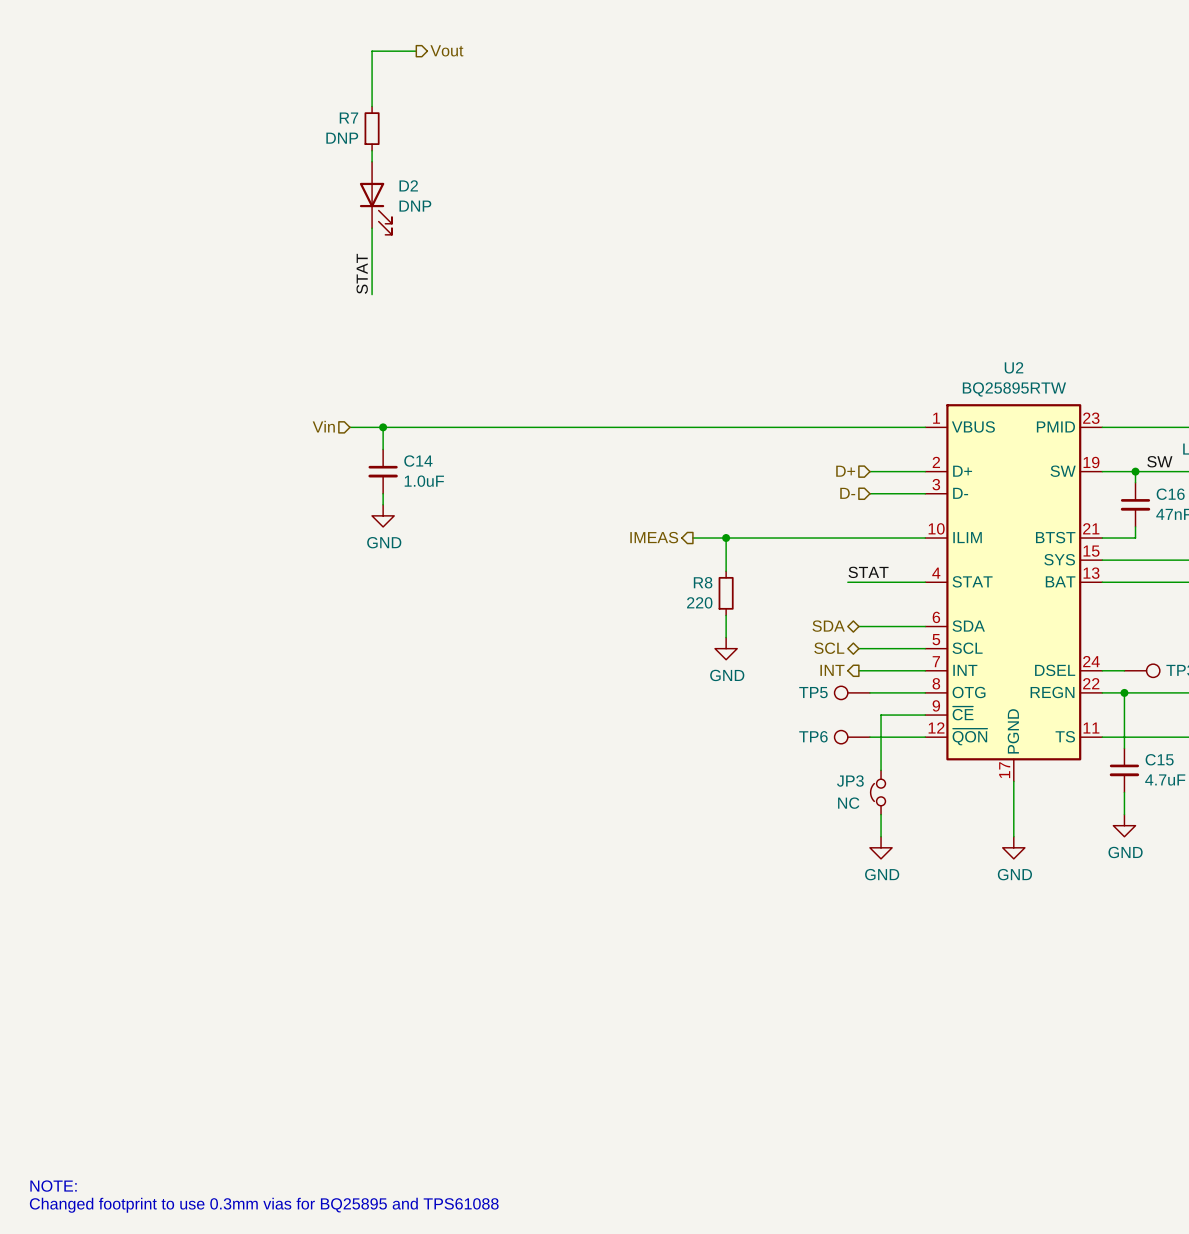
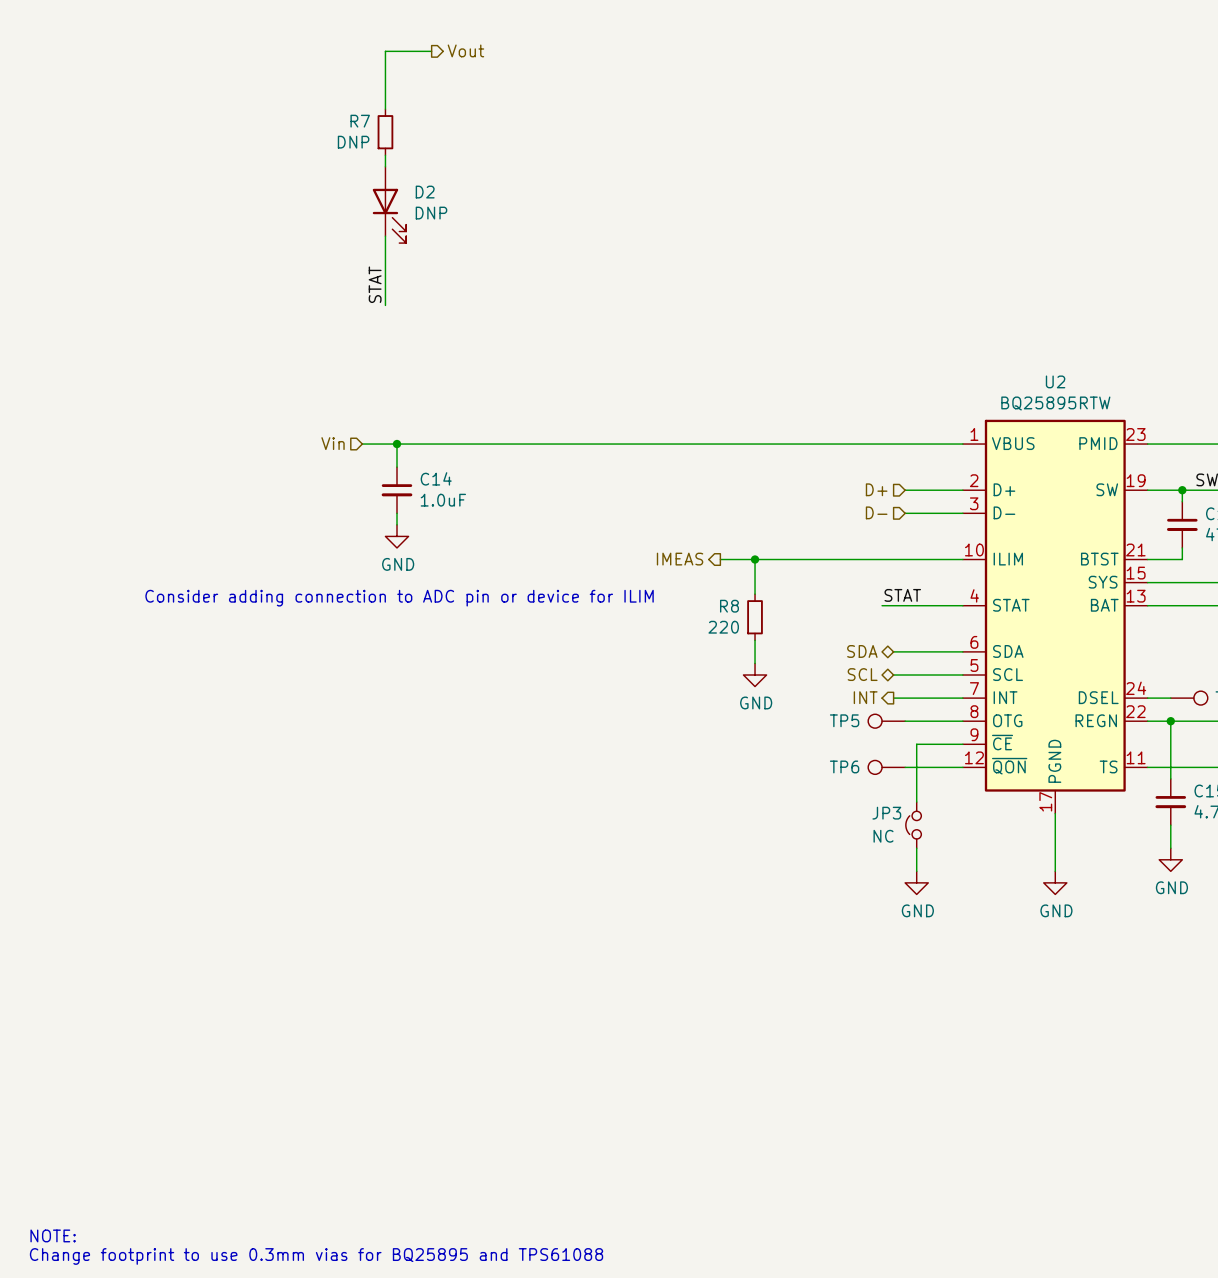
text: none -> Consider adding connection to ADC pin or device for ILIM (399, 598)
text: Changed footprint to use 0.3mm vias for BQ25895 and TPS61088 (264, 1205) -> Change footprint to use 0.3mm vias for BQ25895 and TPS61088 (316, 1256)

